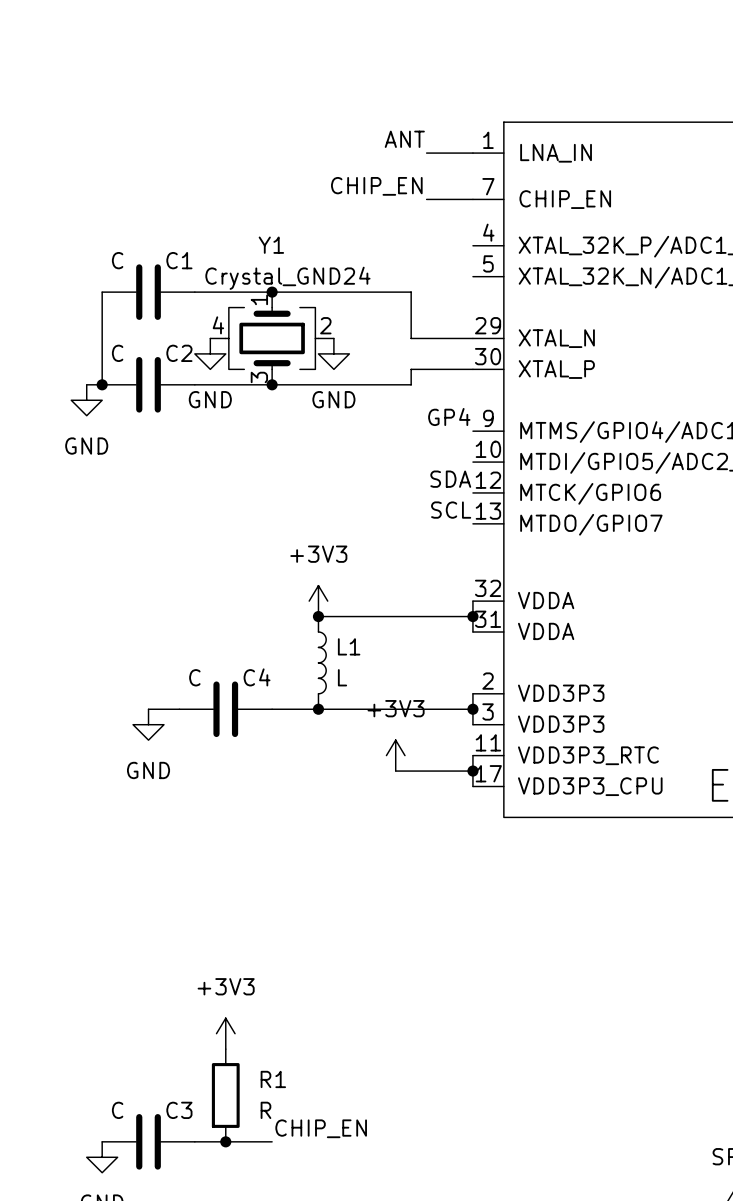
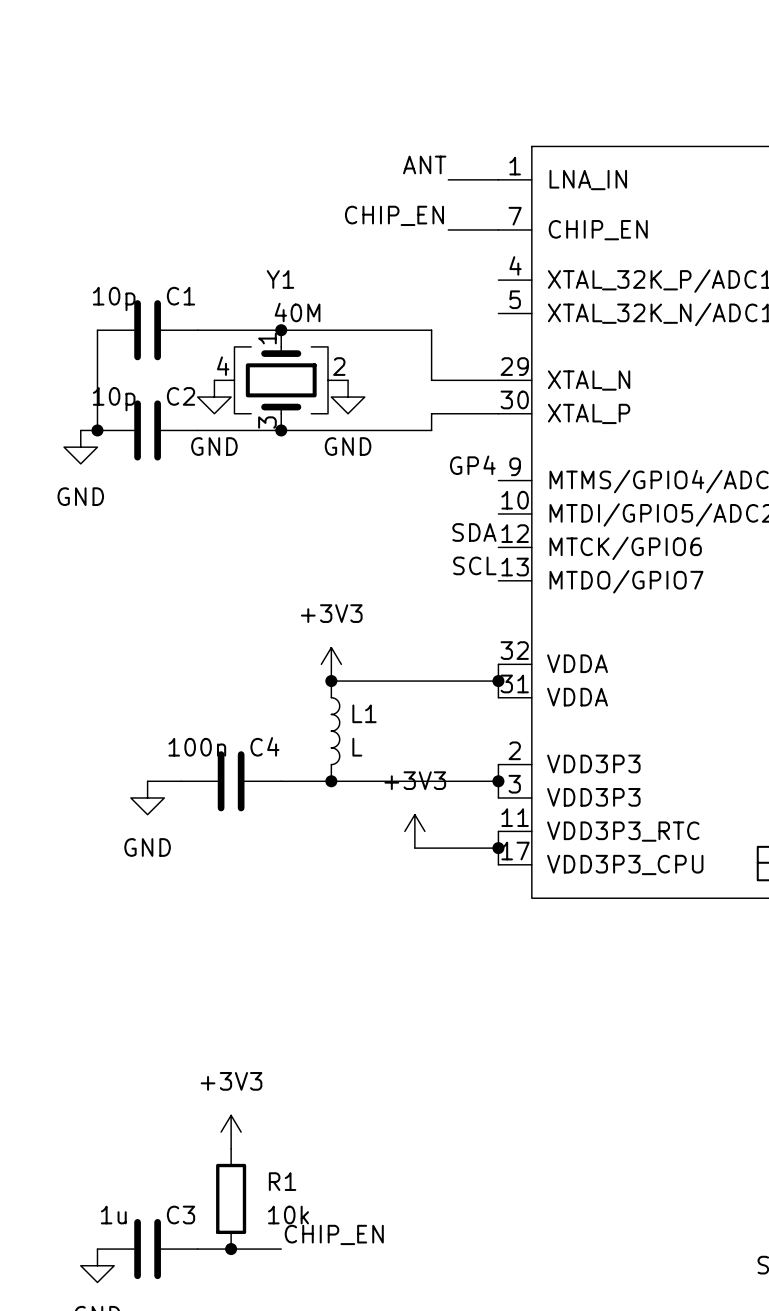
C1 value: C (117, 260) -> 10p (114, 298)
Y1 value: Crystal_GND24 (287, 278) -> 40M (297, 312)
C2 value: C (117, 353) -> 10p (114, 399)
C4 value: C (194, 677) -> 100n (197, 747)
C3 value: C (117, 1110) -> 1u (113, 1215)
R1 value: R (265, 1110) -> 10k (288, 1215)

